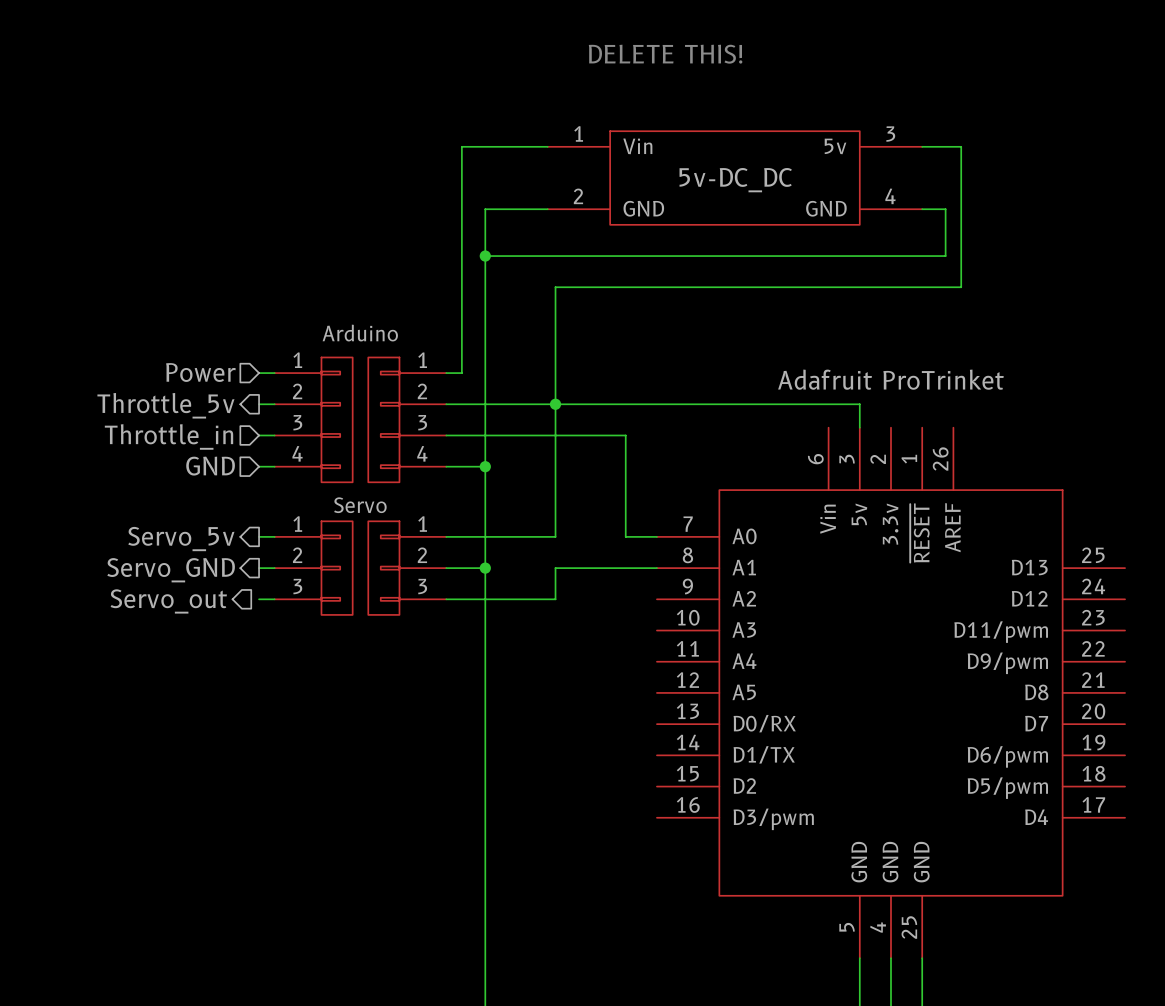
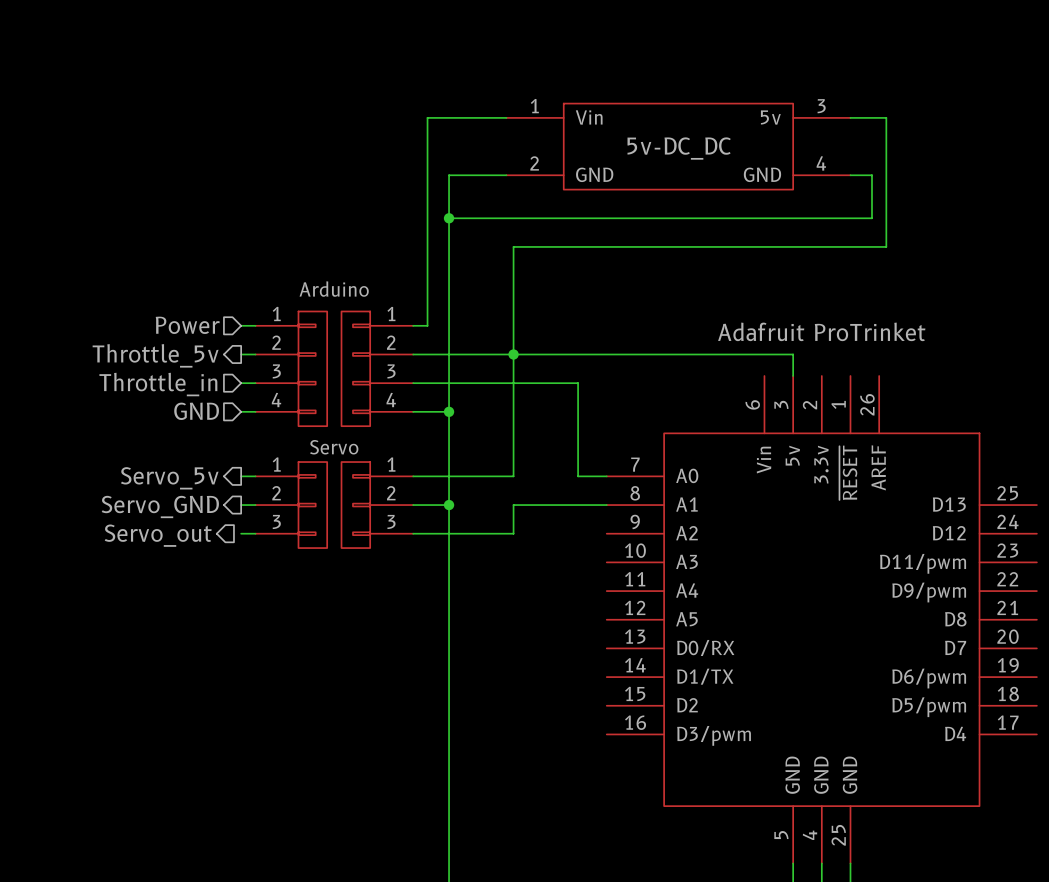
text: DELETE THIS! (665, 54) -> none

